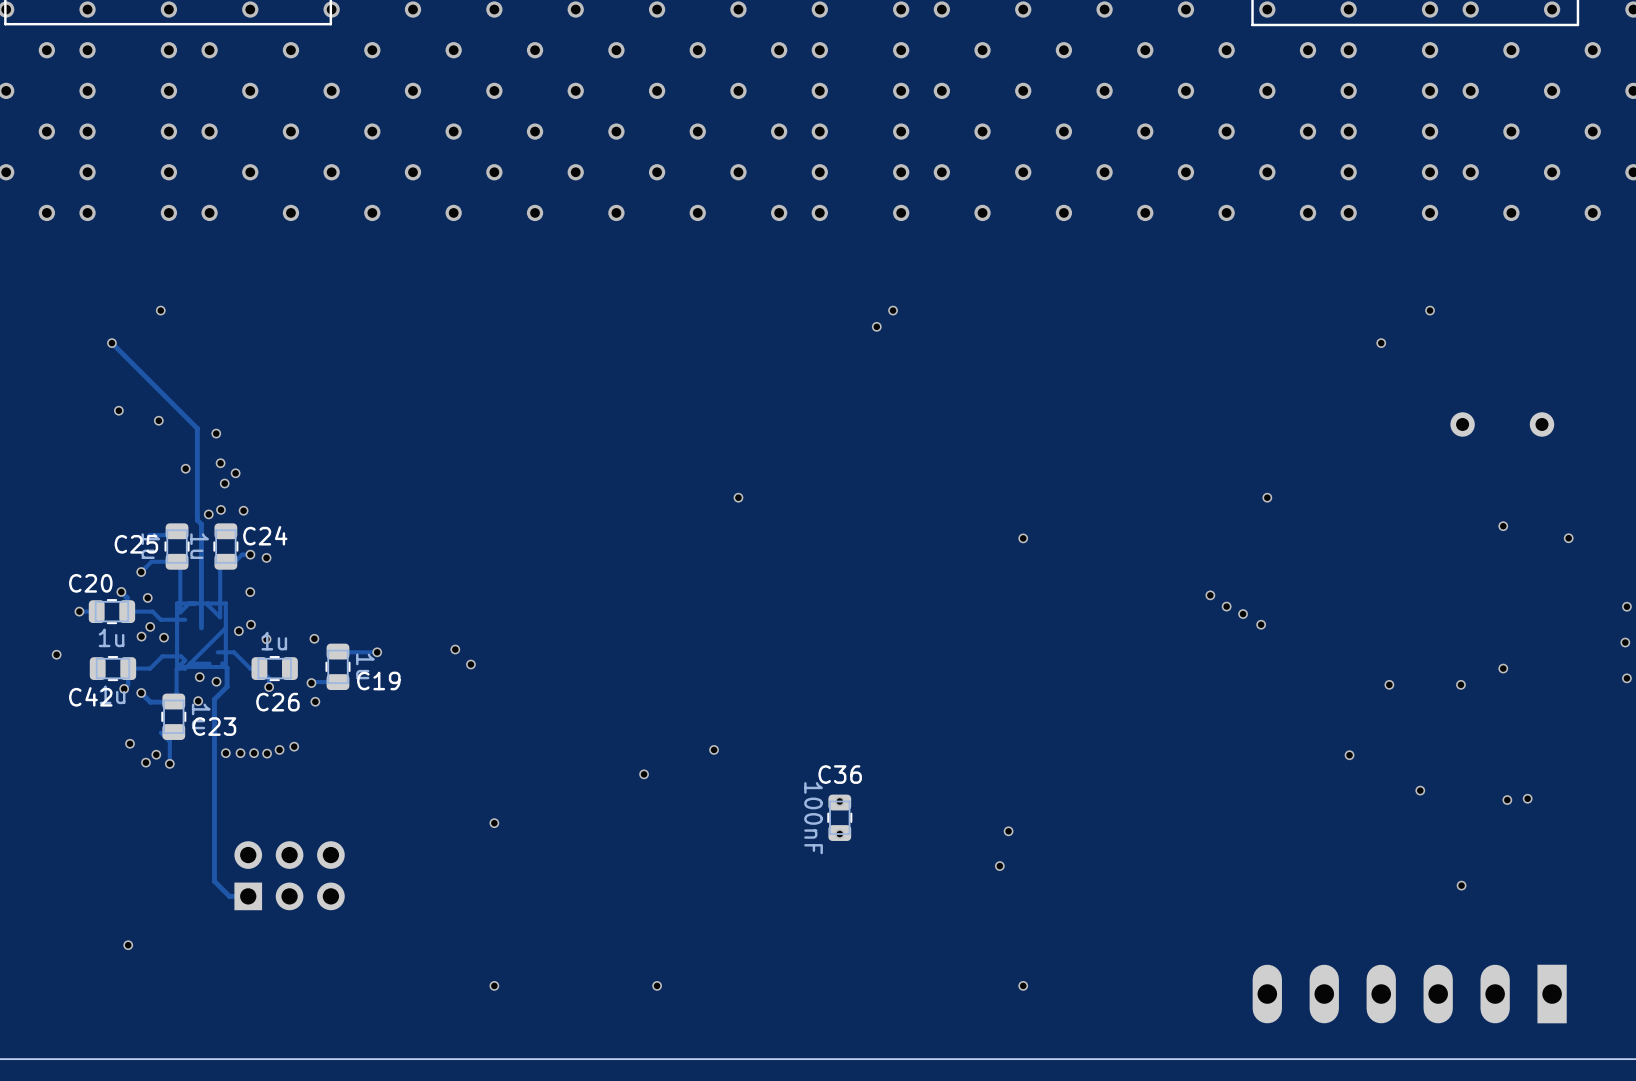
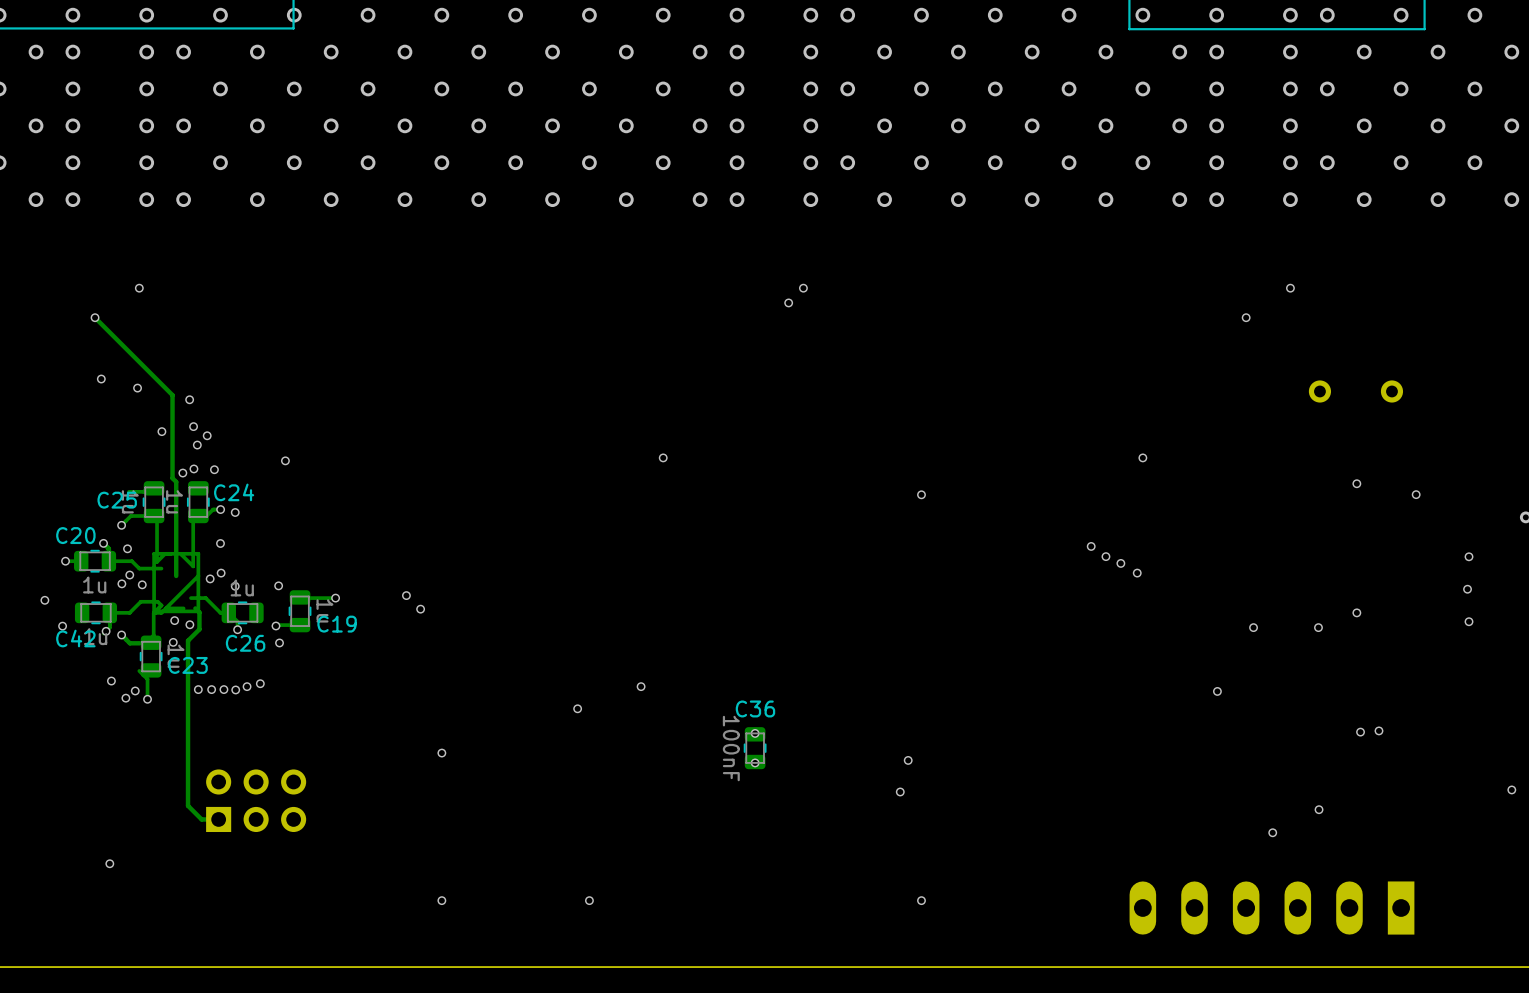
via: none -> (285, 460)
via: none -> (62, 626)
via: (1420, 790) -> none
via: none -> (1272, 832)

